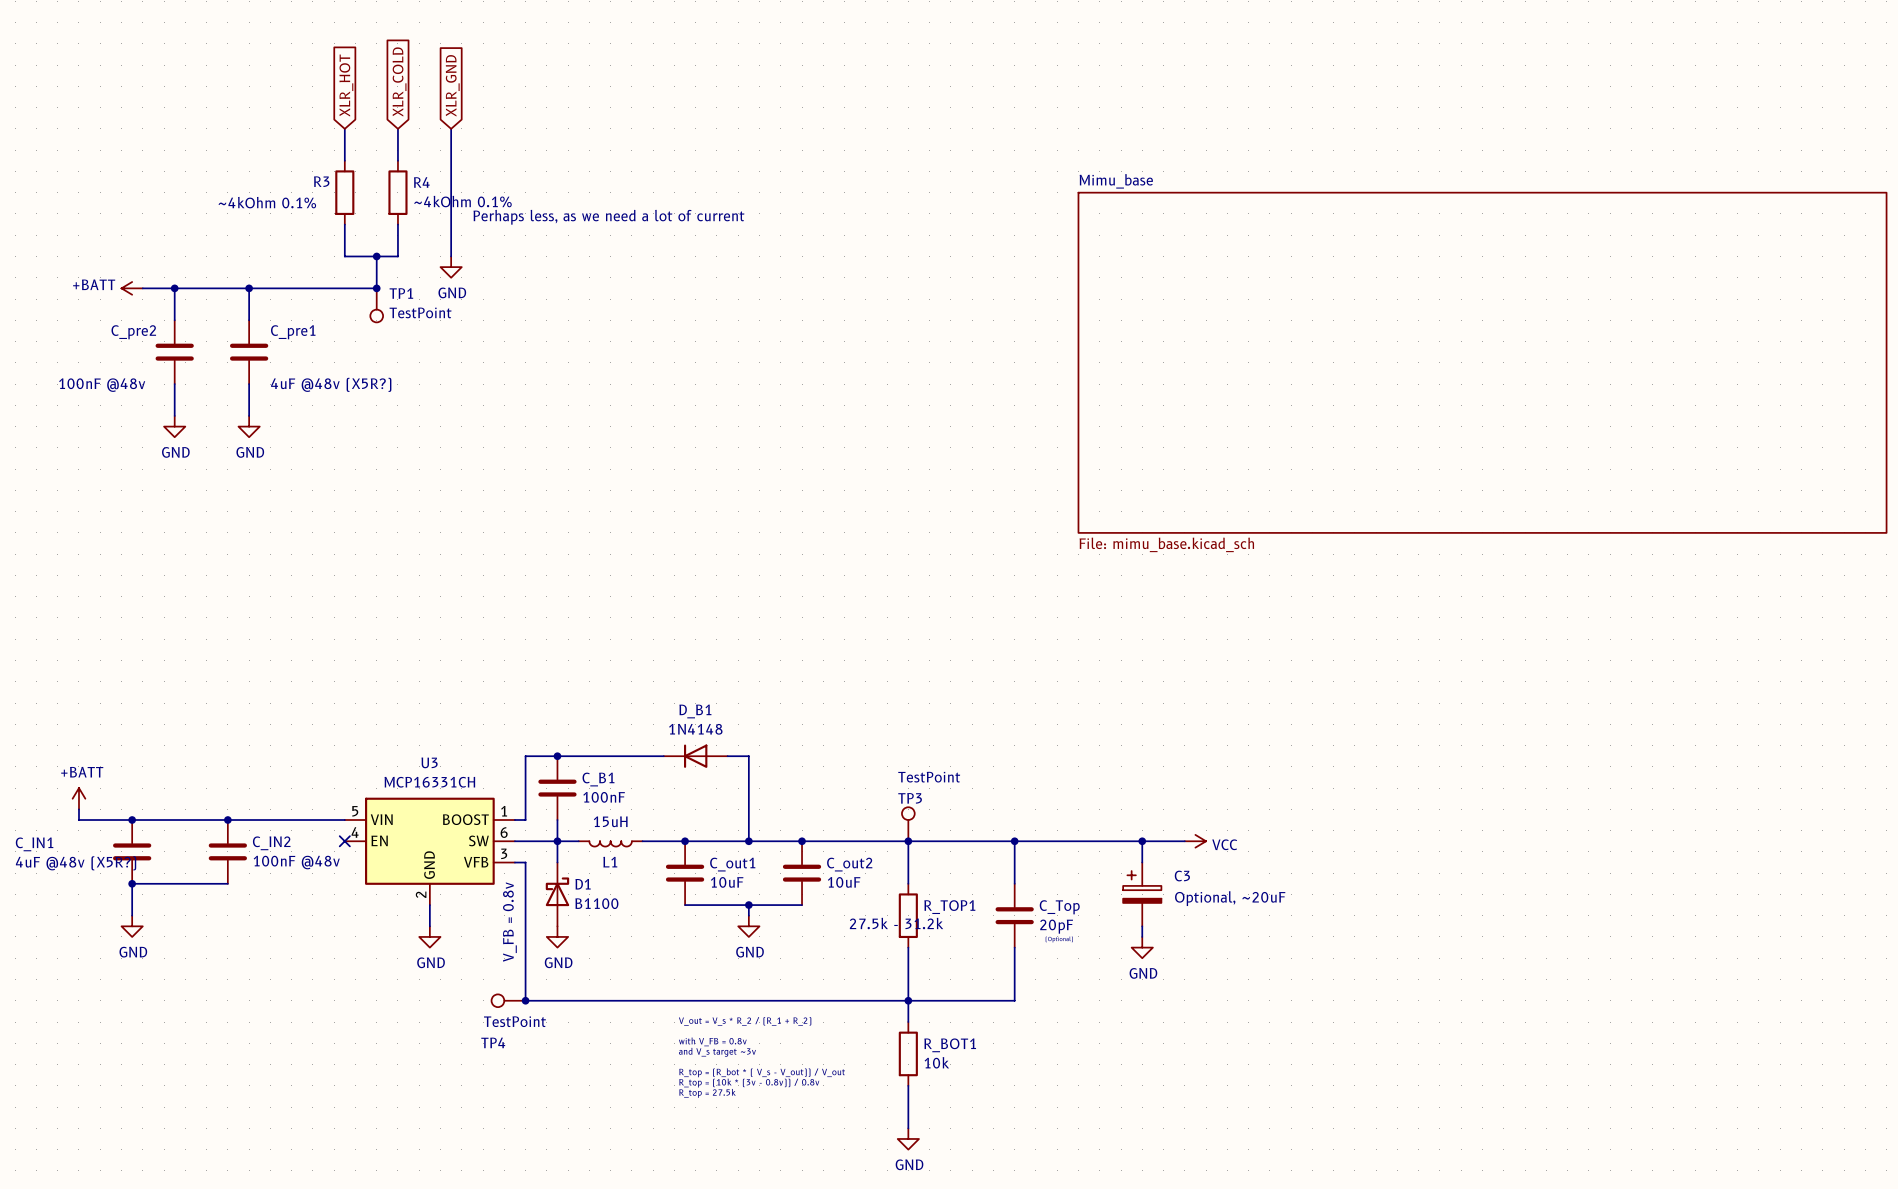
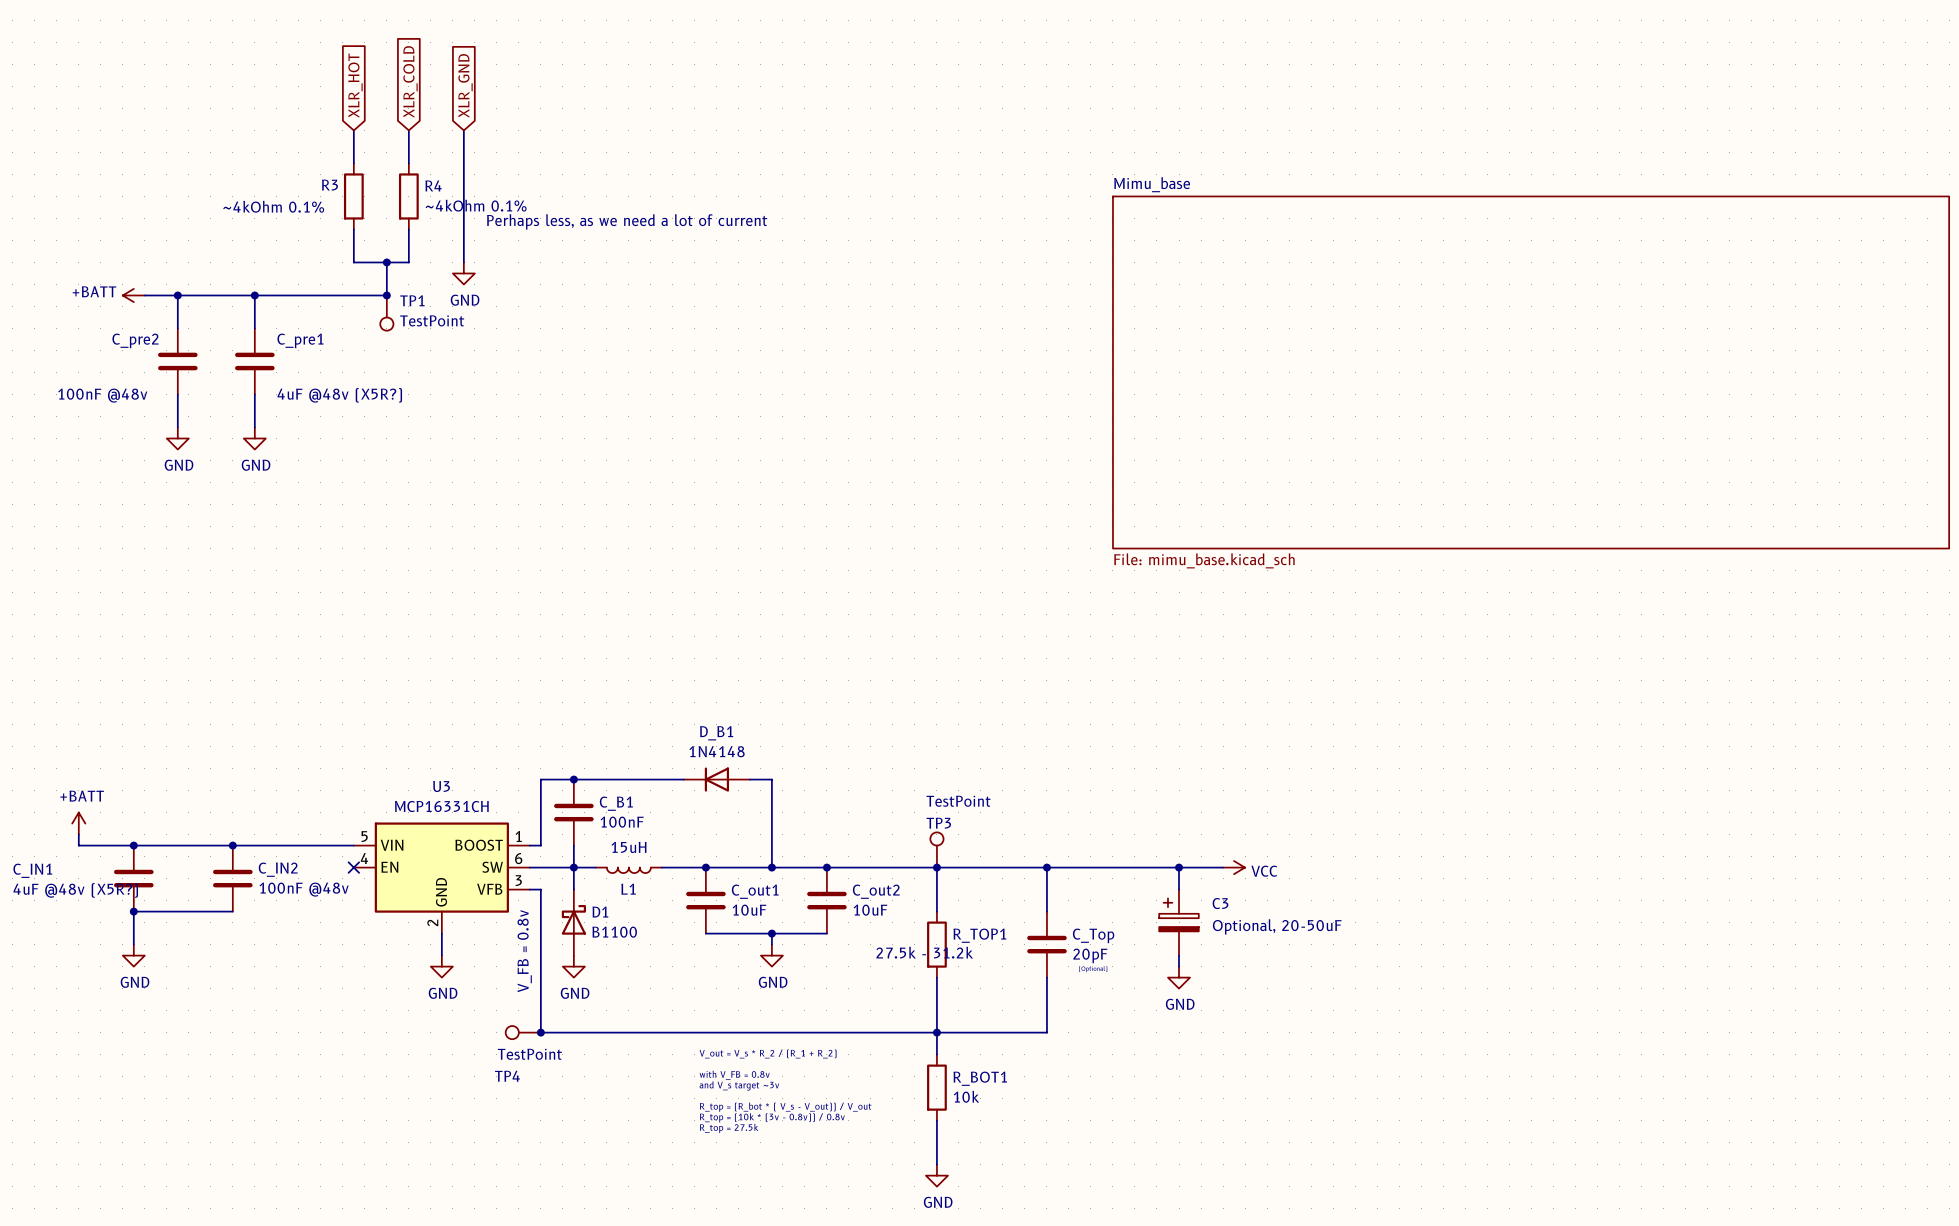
C3 value: Optional, ~20uF (1230, 898) -> Optional, 20-50uF (1277, 926)

